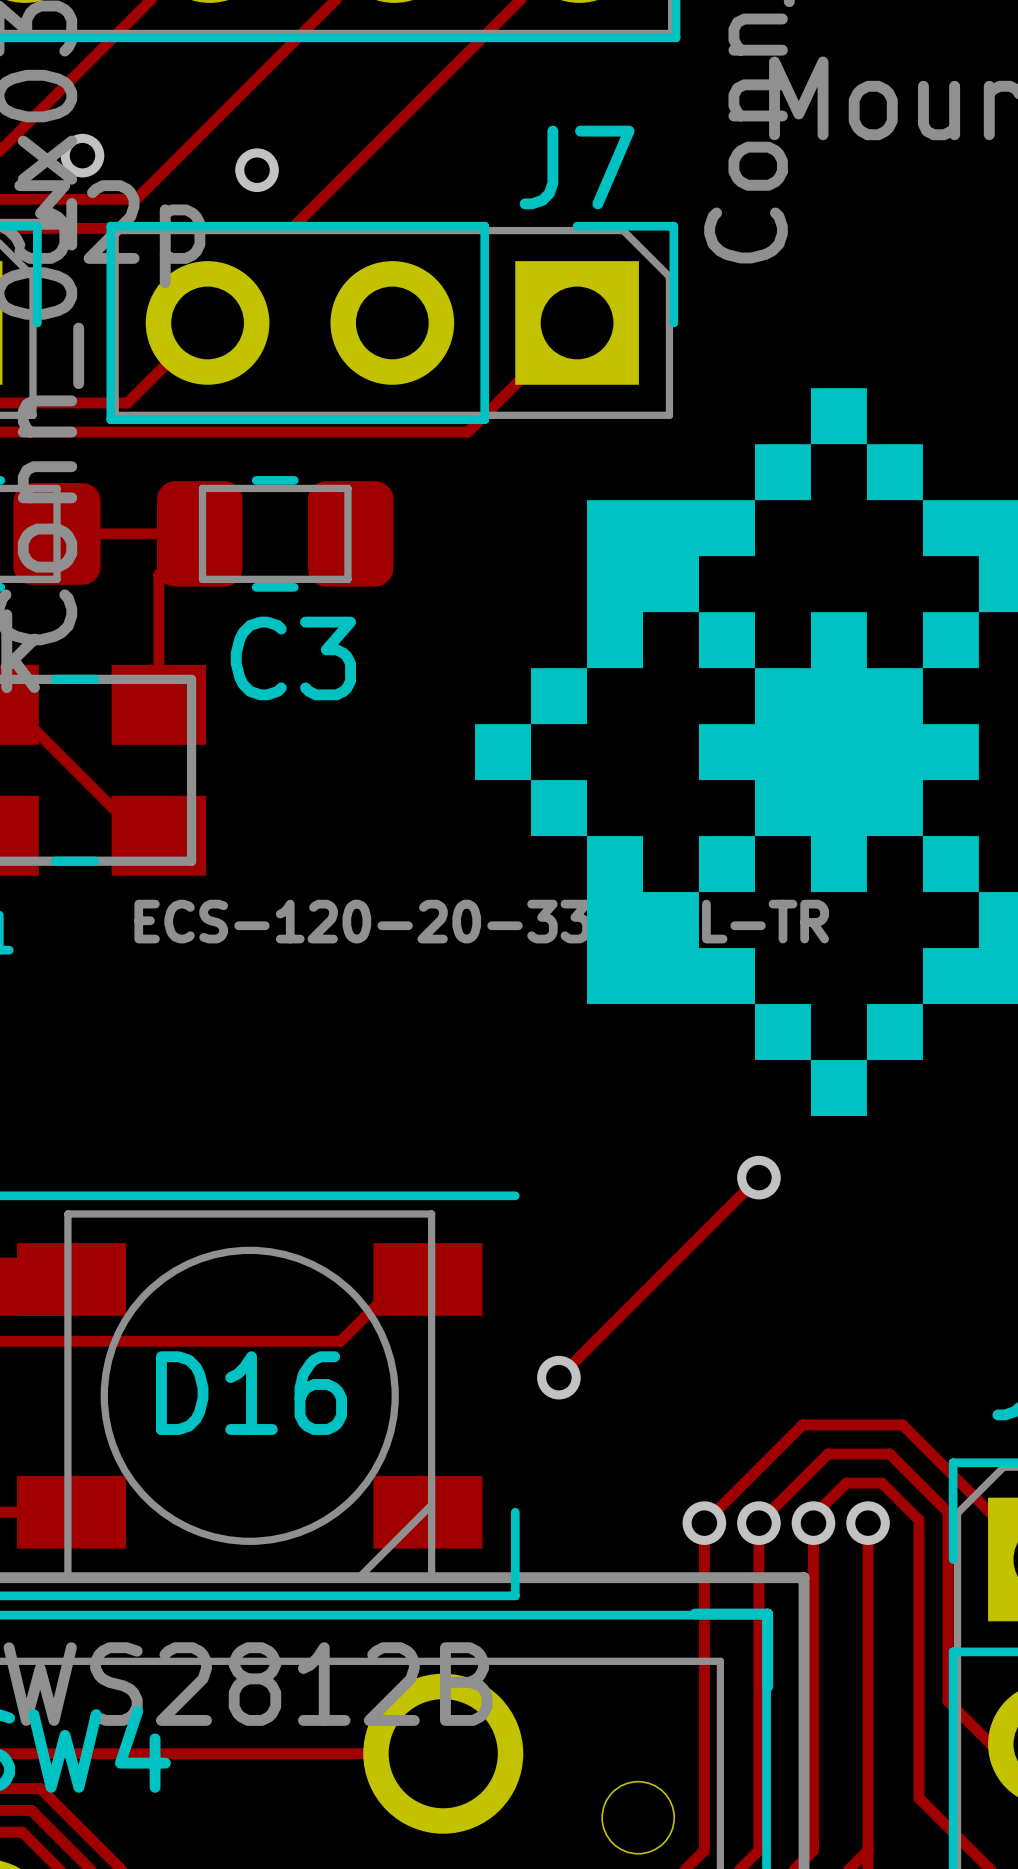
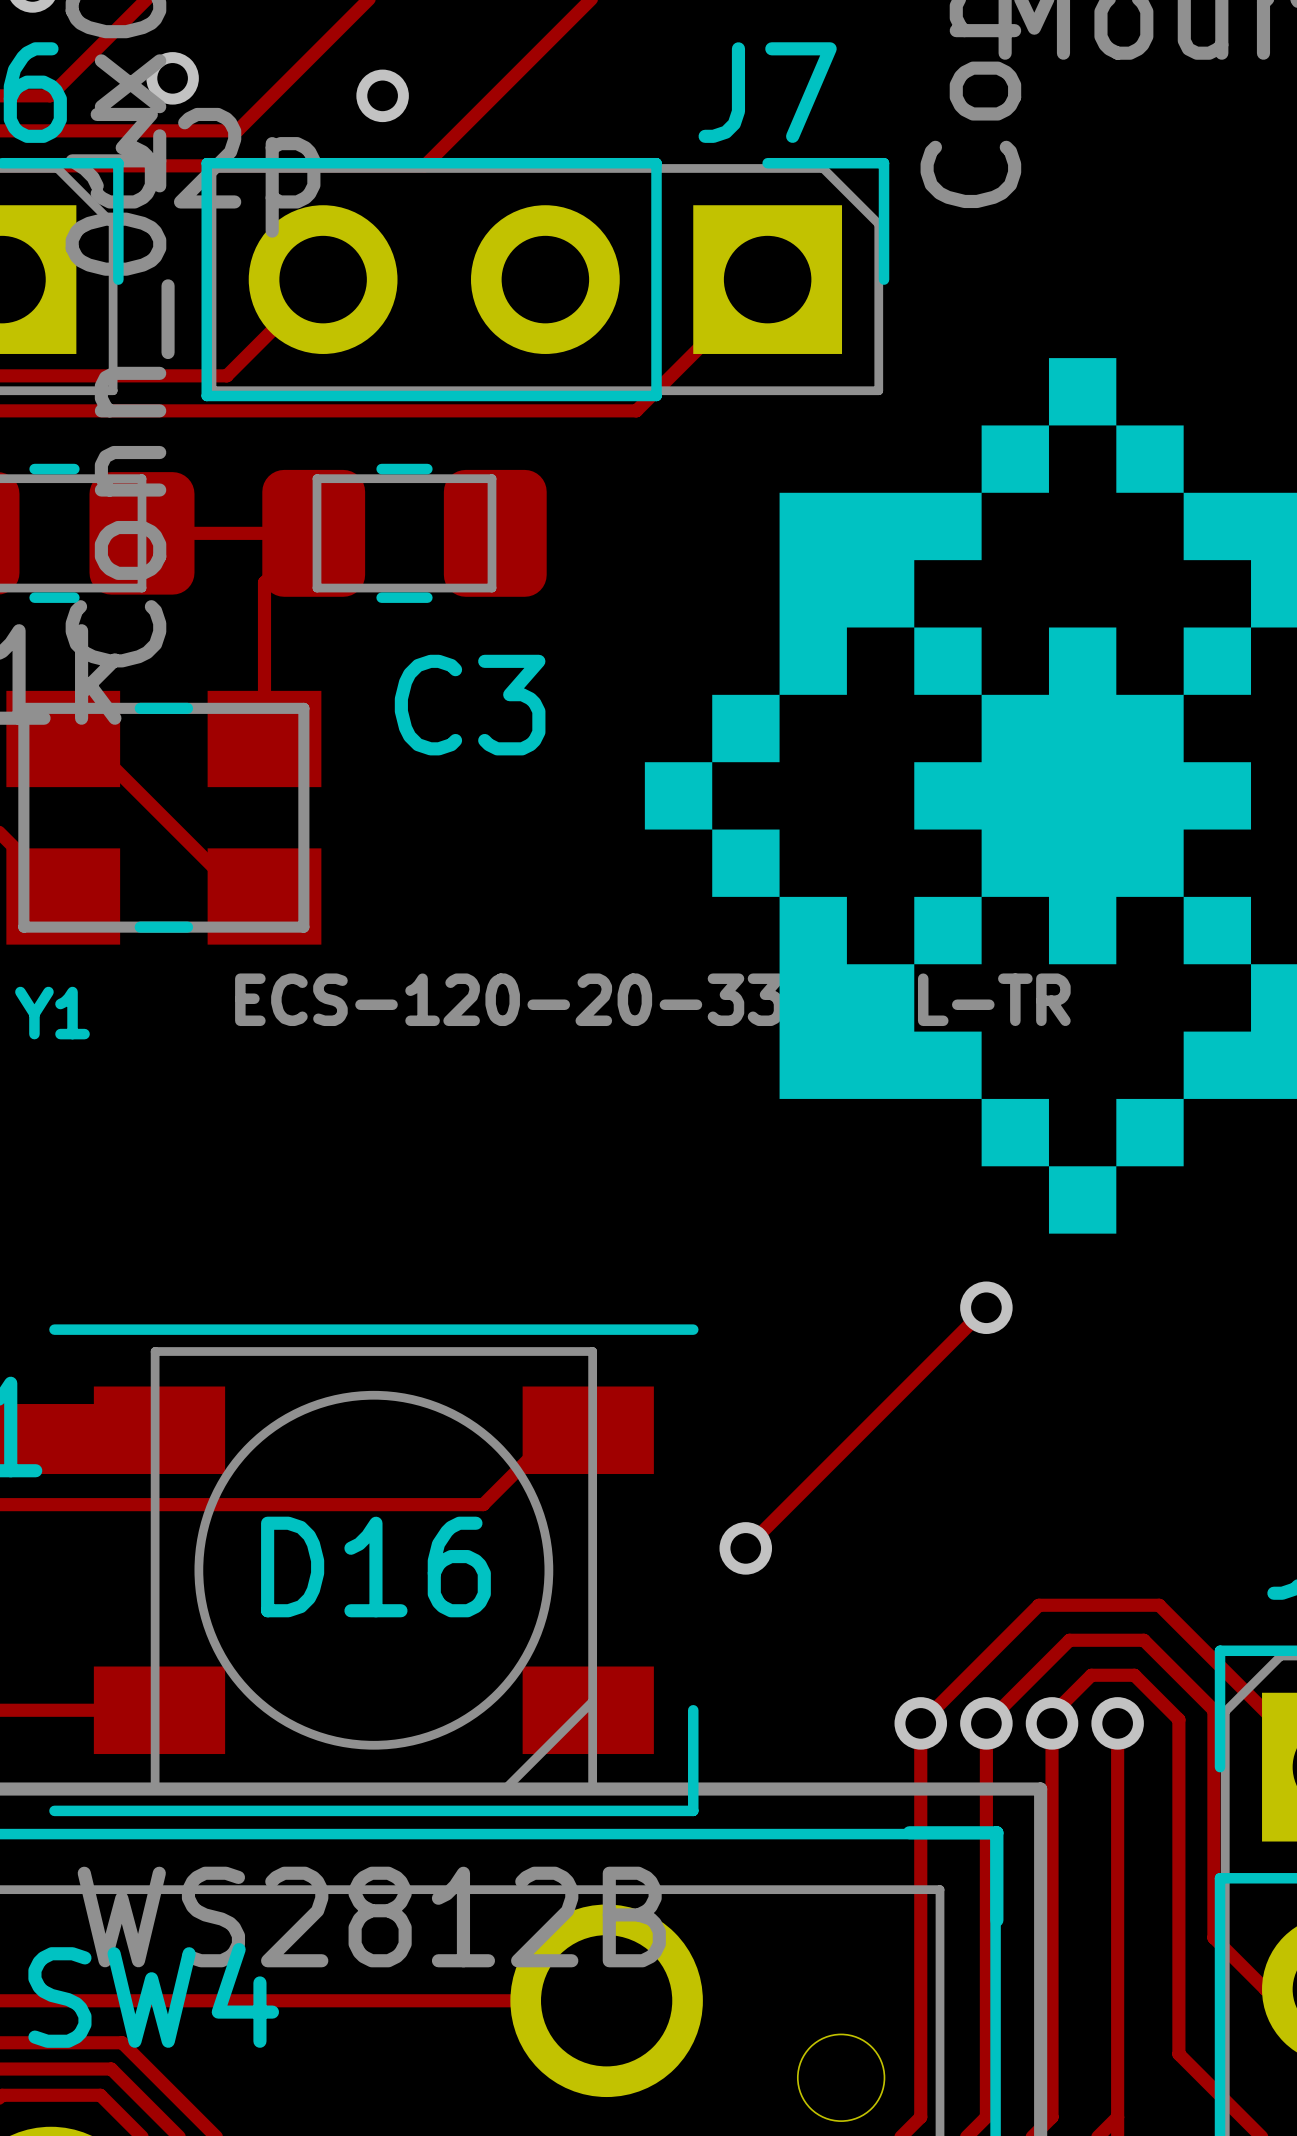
C3 name position: C3 (293, 658) -> C3 (470, 705)

